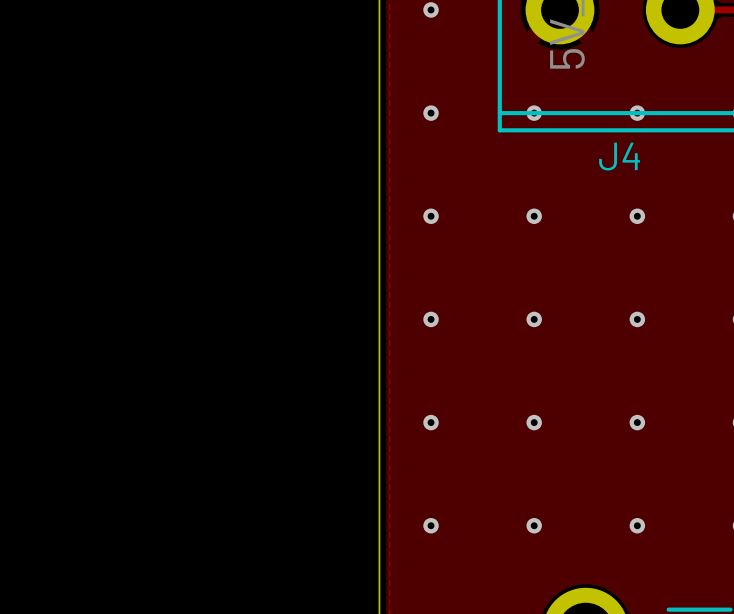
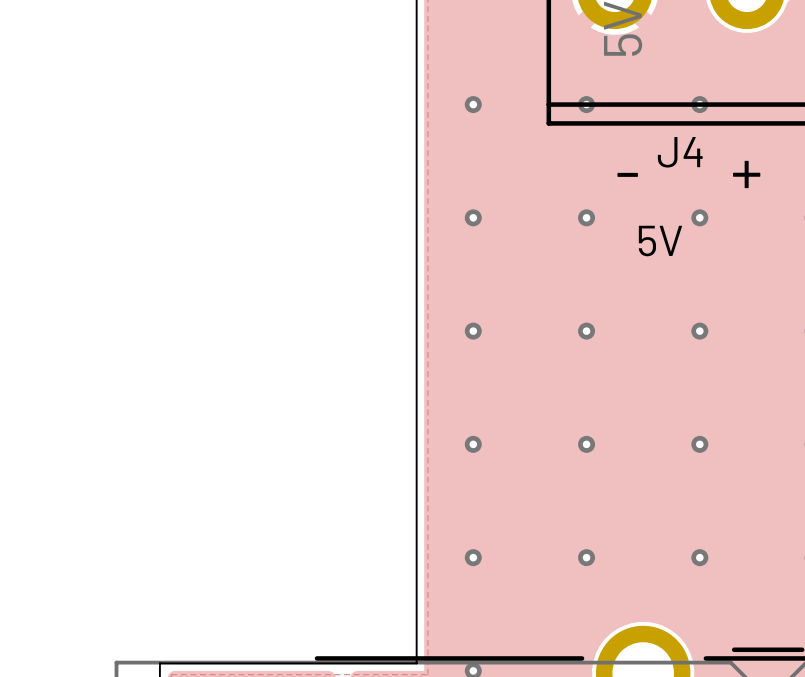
text: none -> + (746, 174)
text: none -> - (627, 174)
text: none -> 5V (660, 241)

